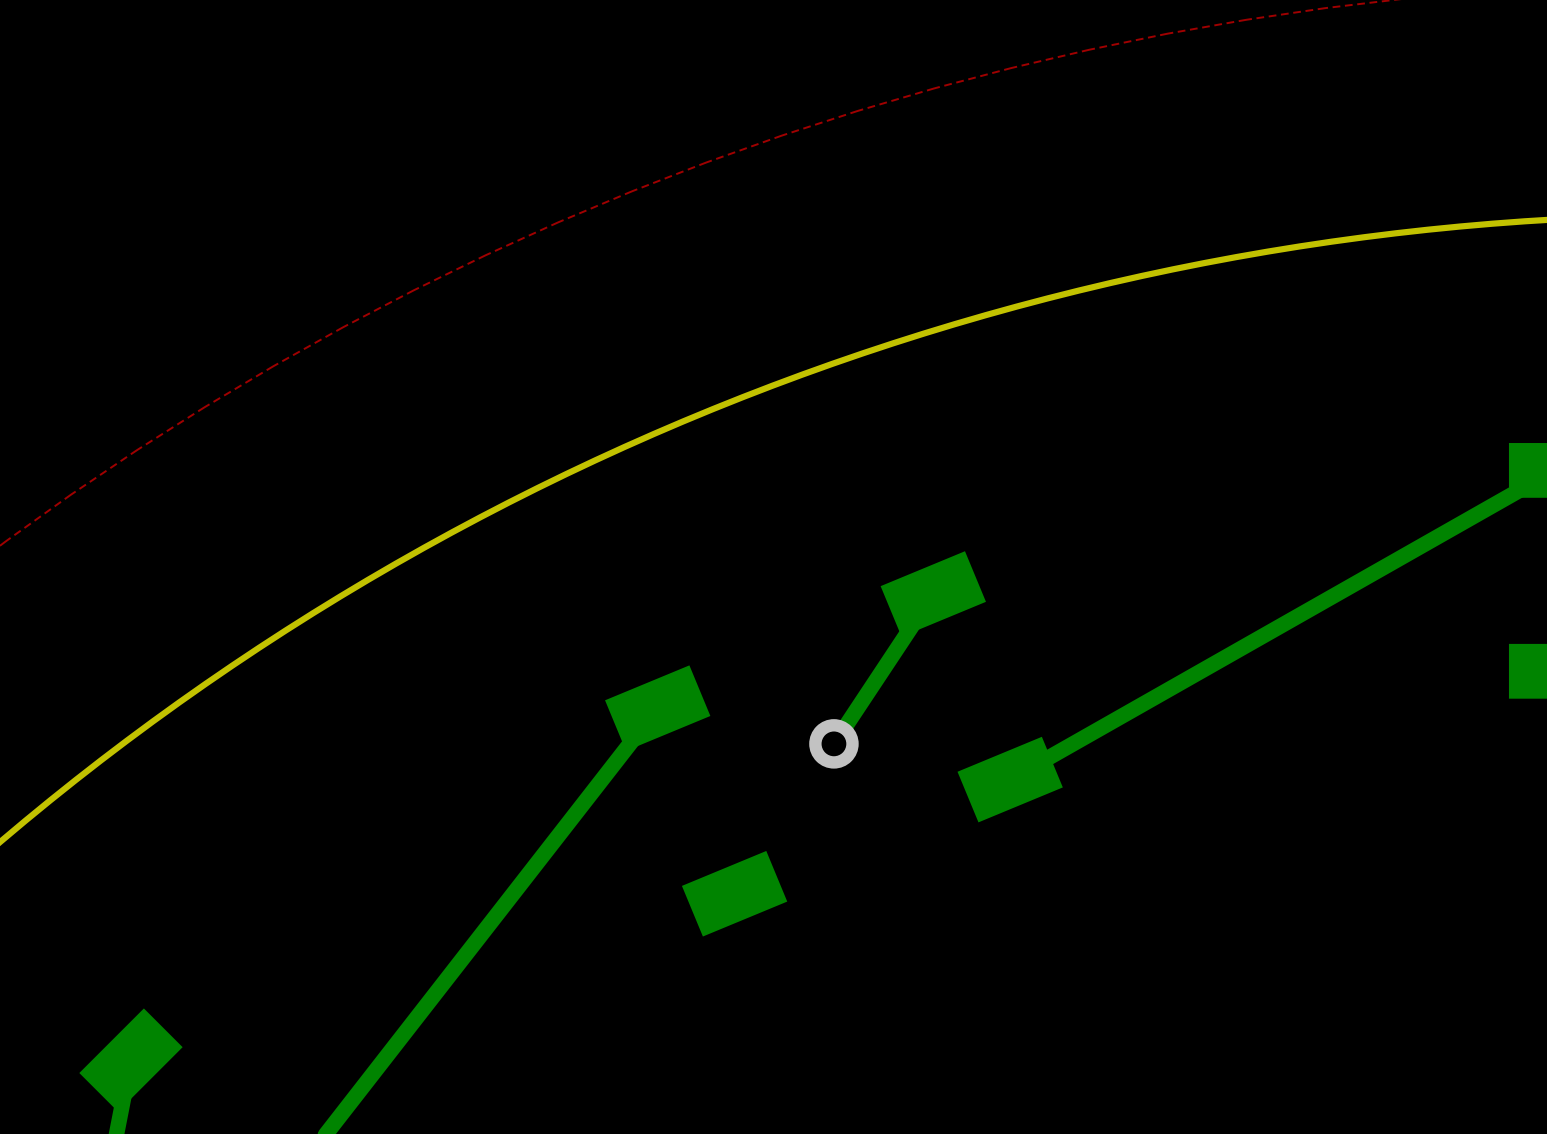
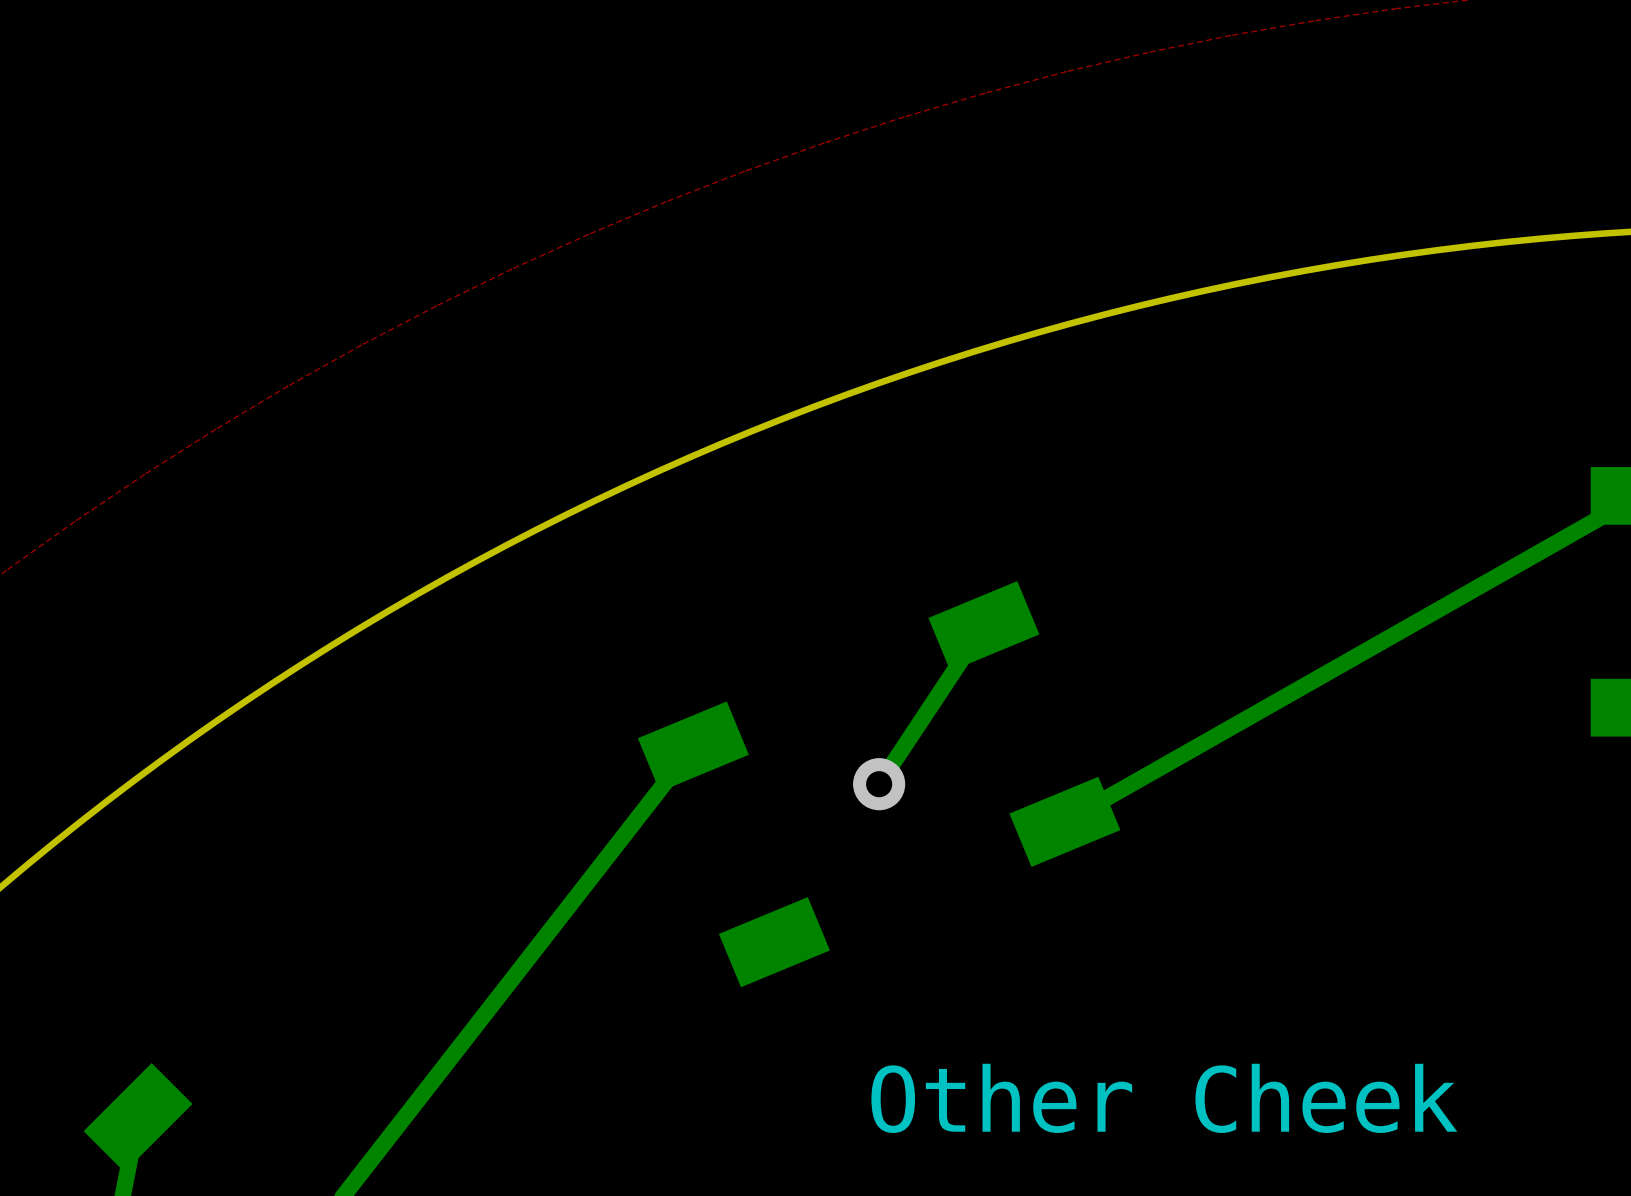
text: none -> Other Cheek (1164, 1098)

